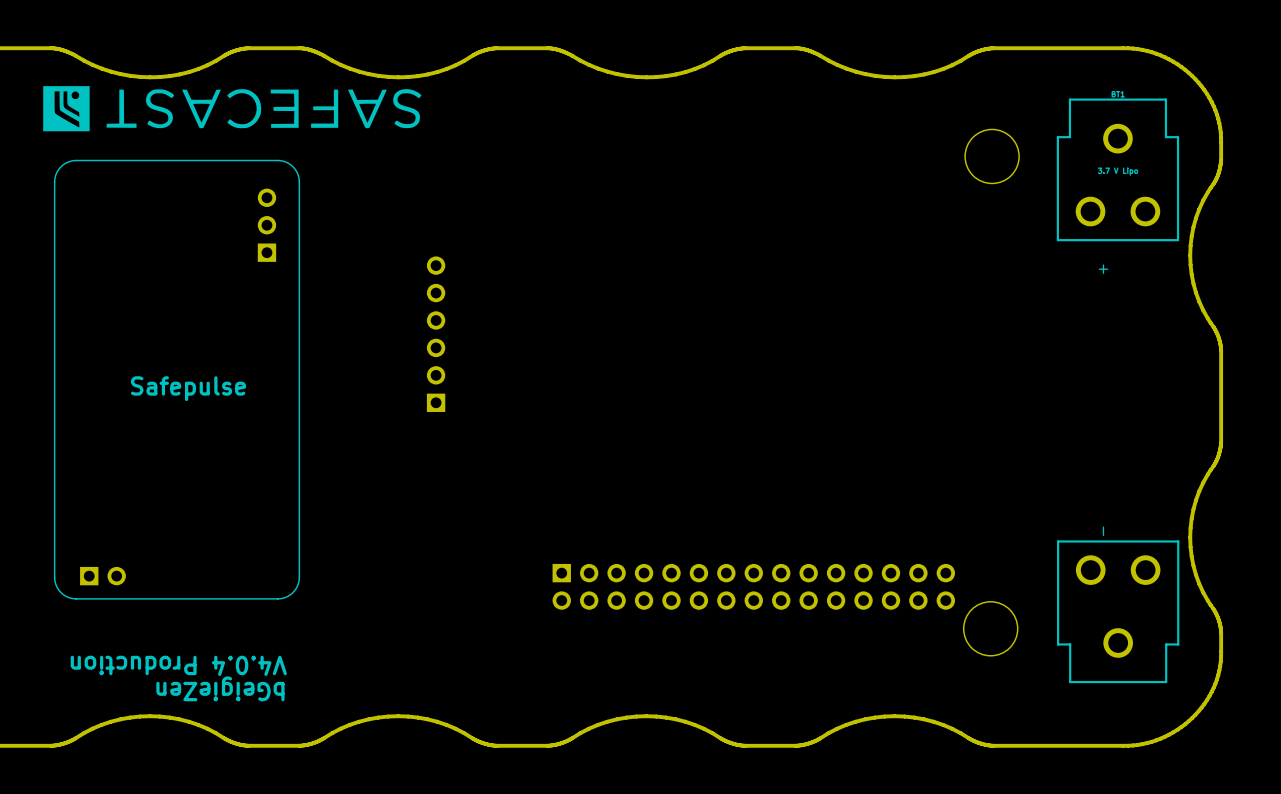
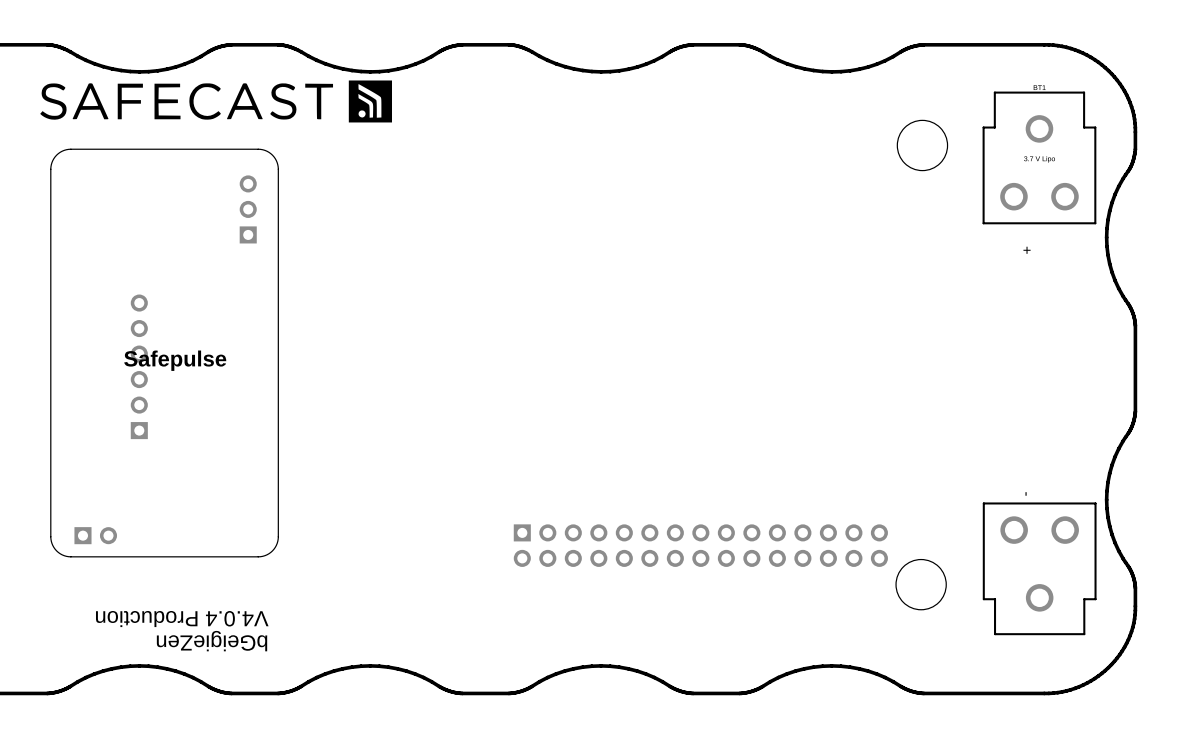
drawing shape: [43, 86, 422, 132] -> [40, 80, 393, 123]
part: (436, 334) -> none
part: none -> (139, 366)

